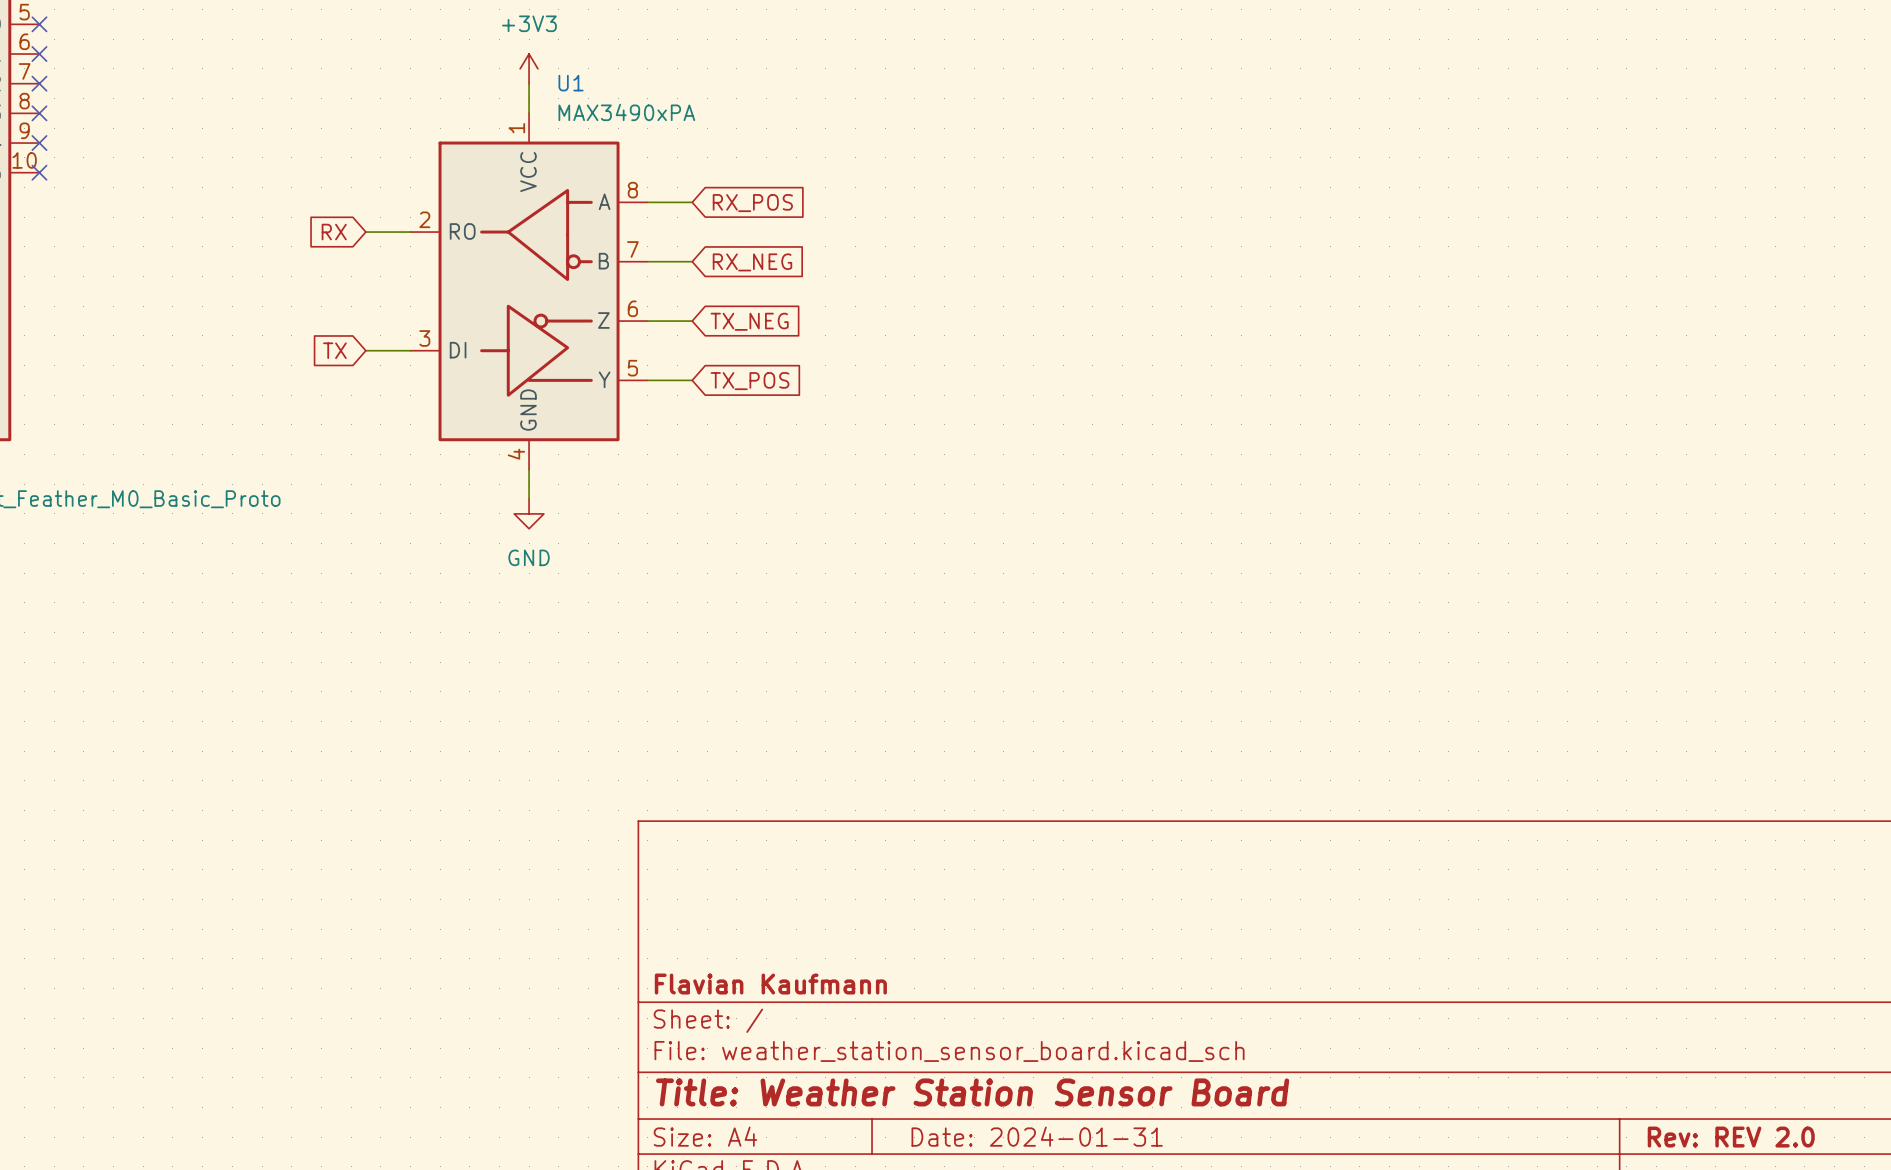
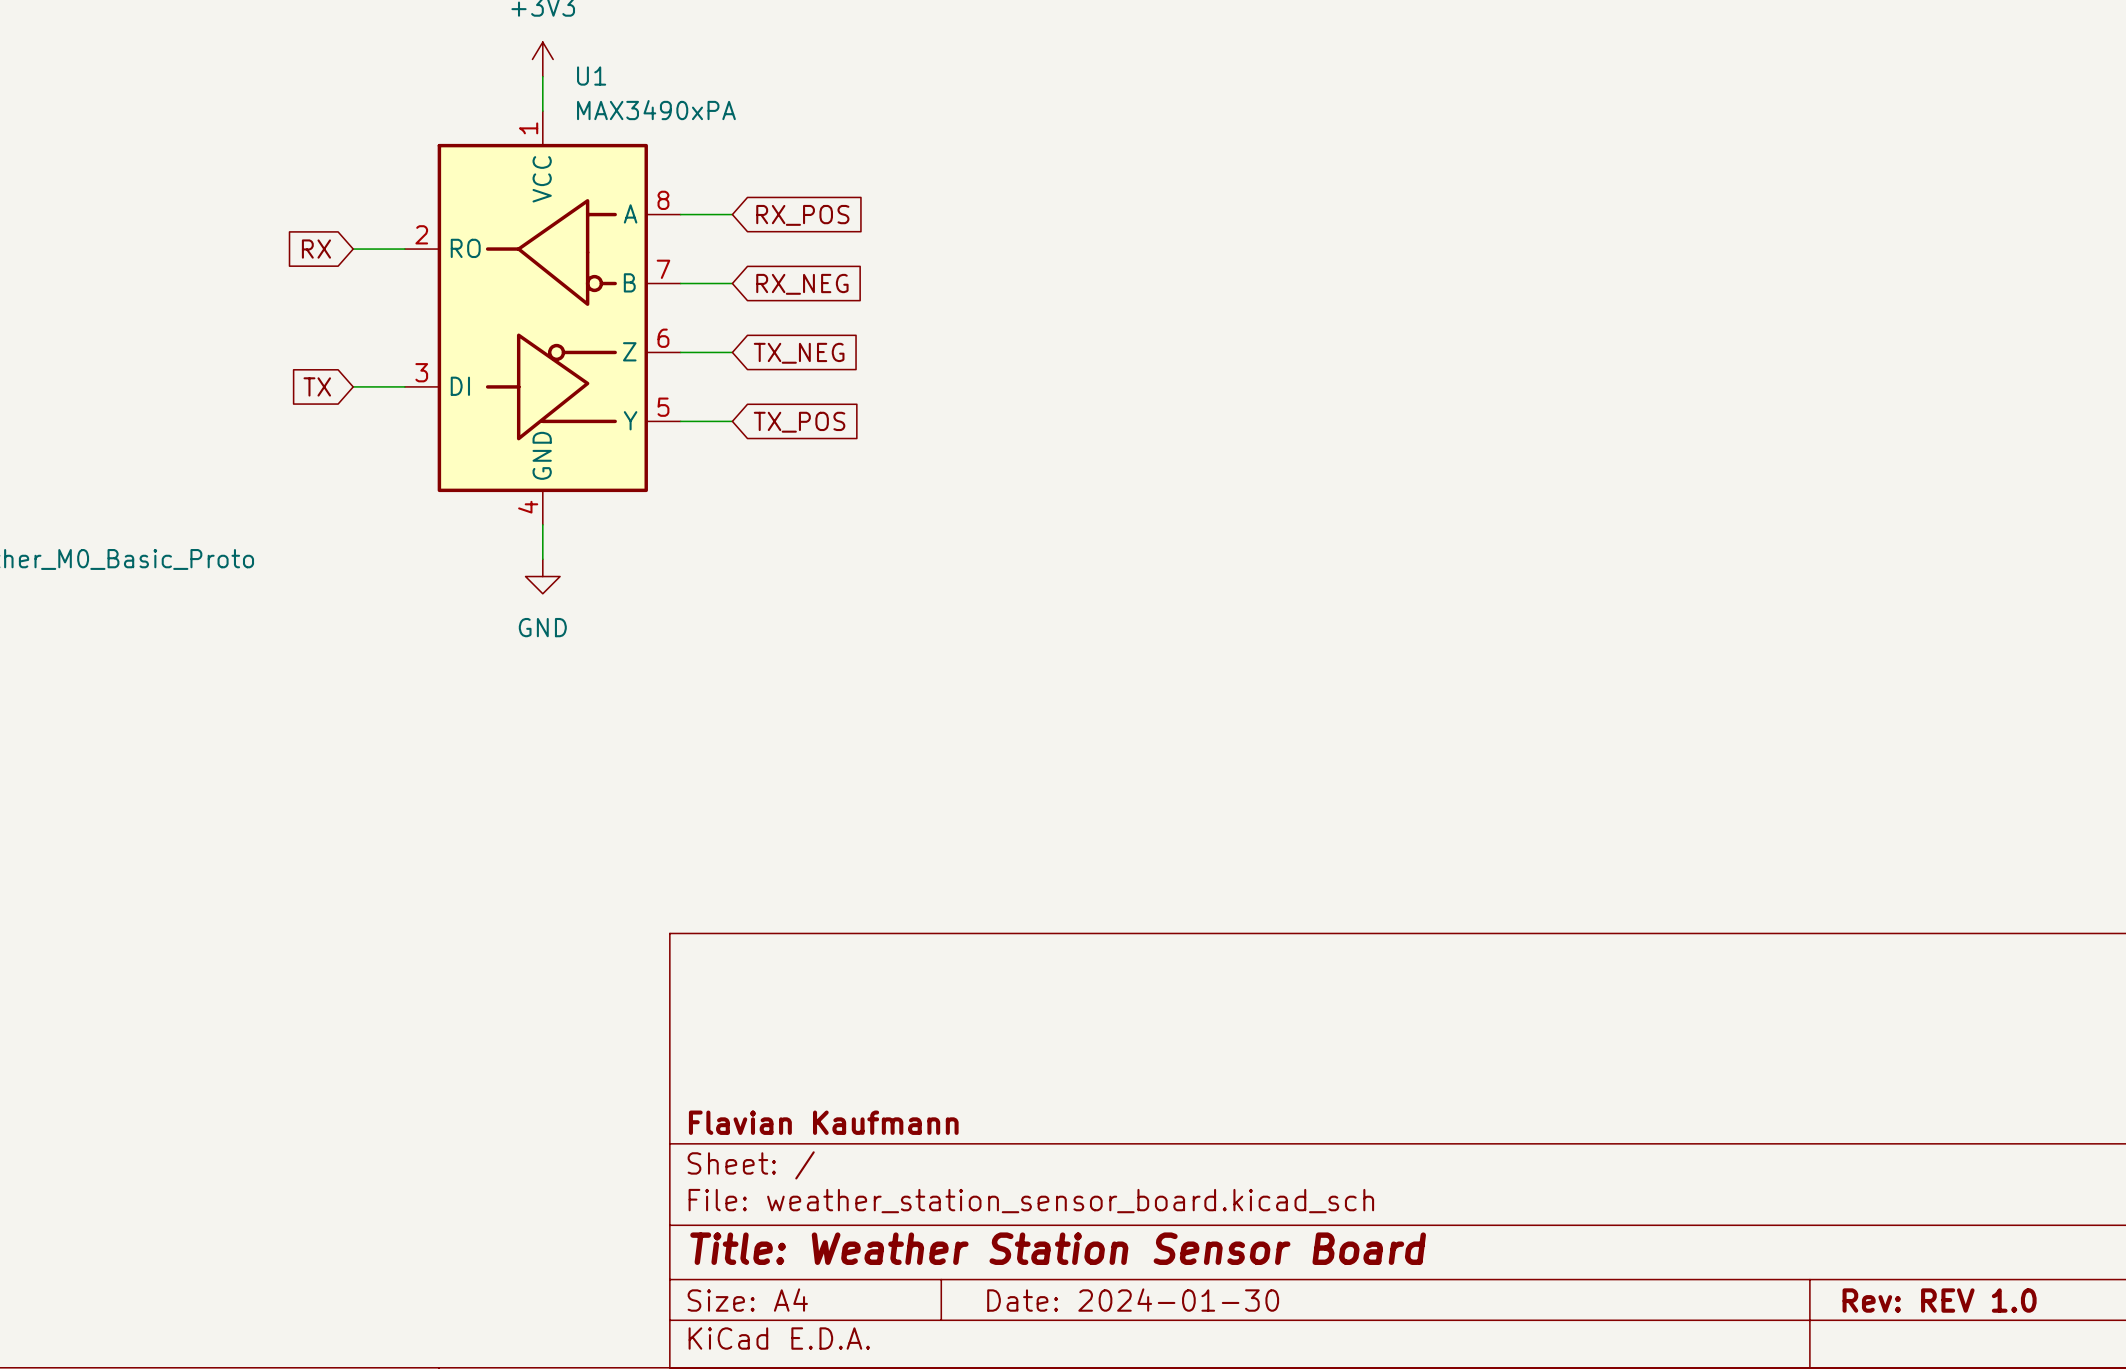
title block: Date: 2024-01-31 (1037, 1136) -> Date: 2024-01-30 (1133, 1300)
title block: Rev: REV 2.0 (1731, 1137) -> Rev: REV 1.0 (1939, 1300)

